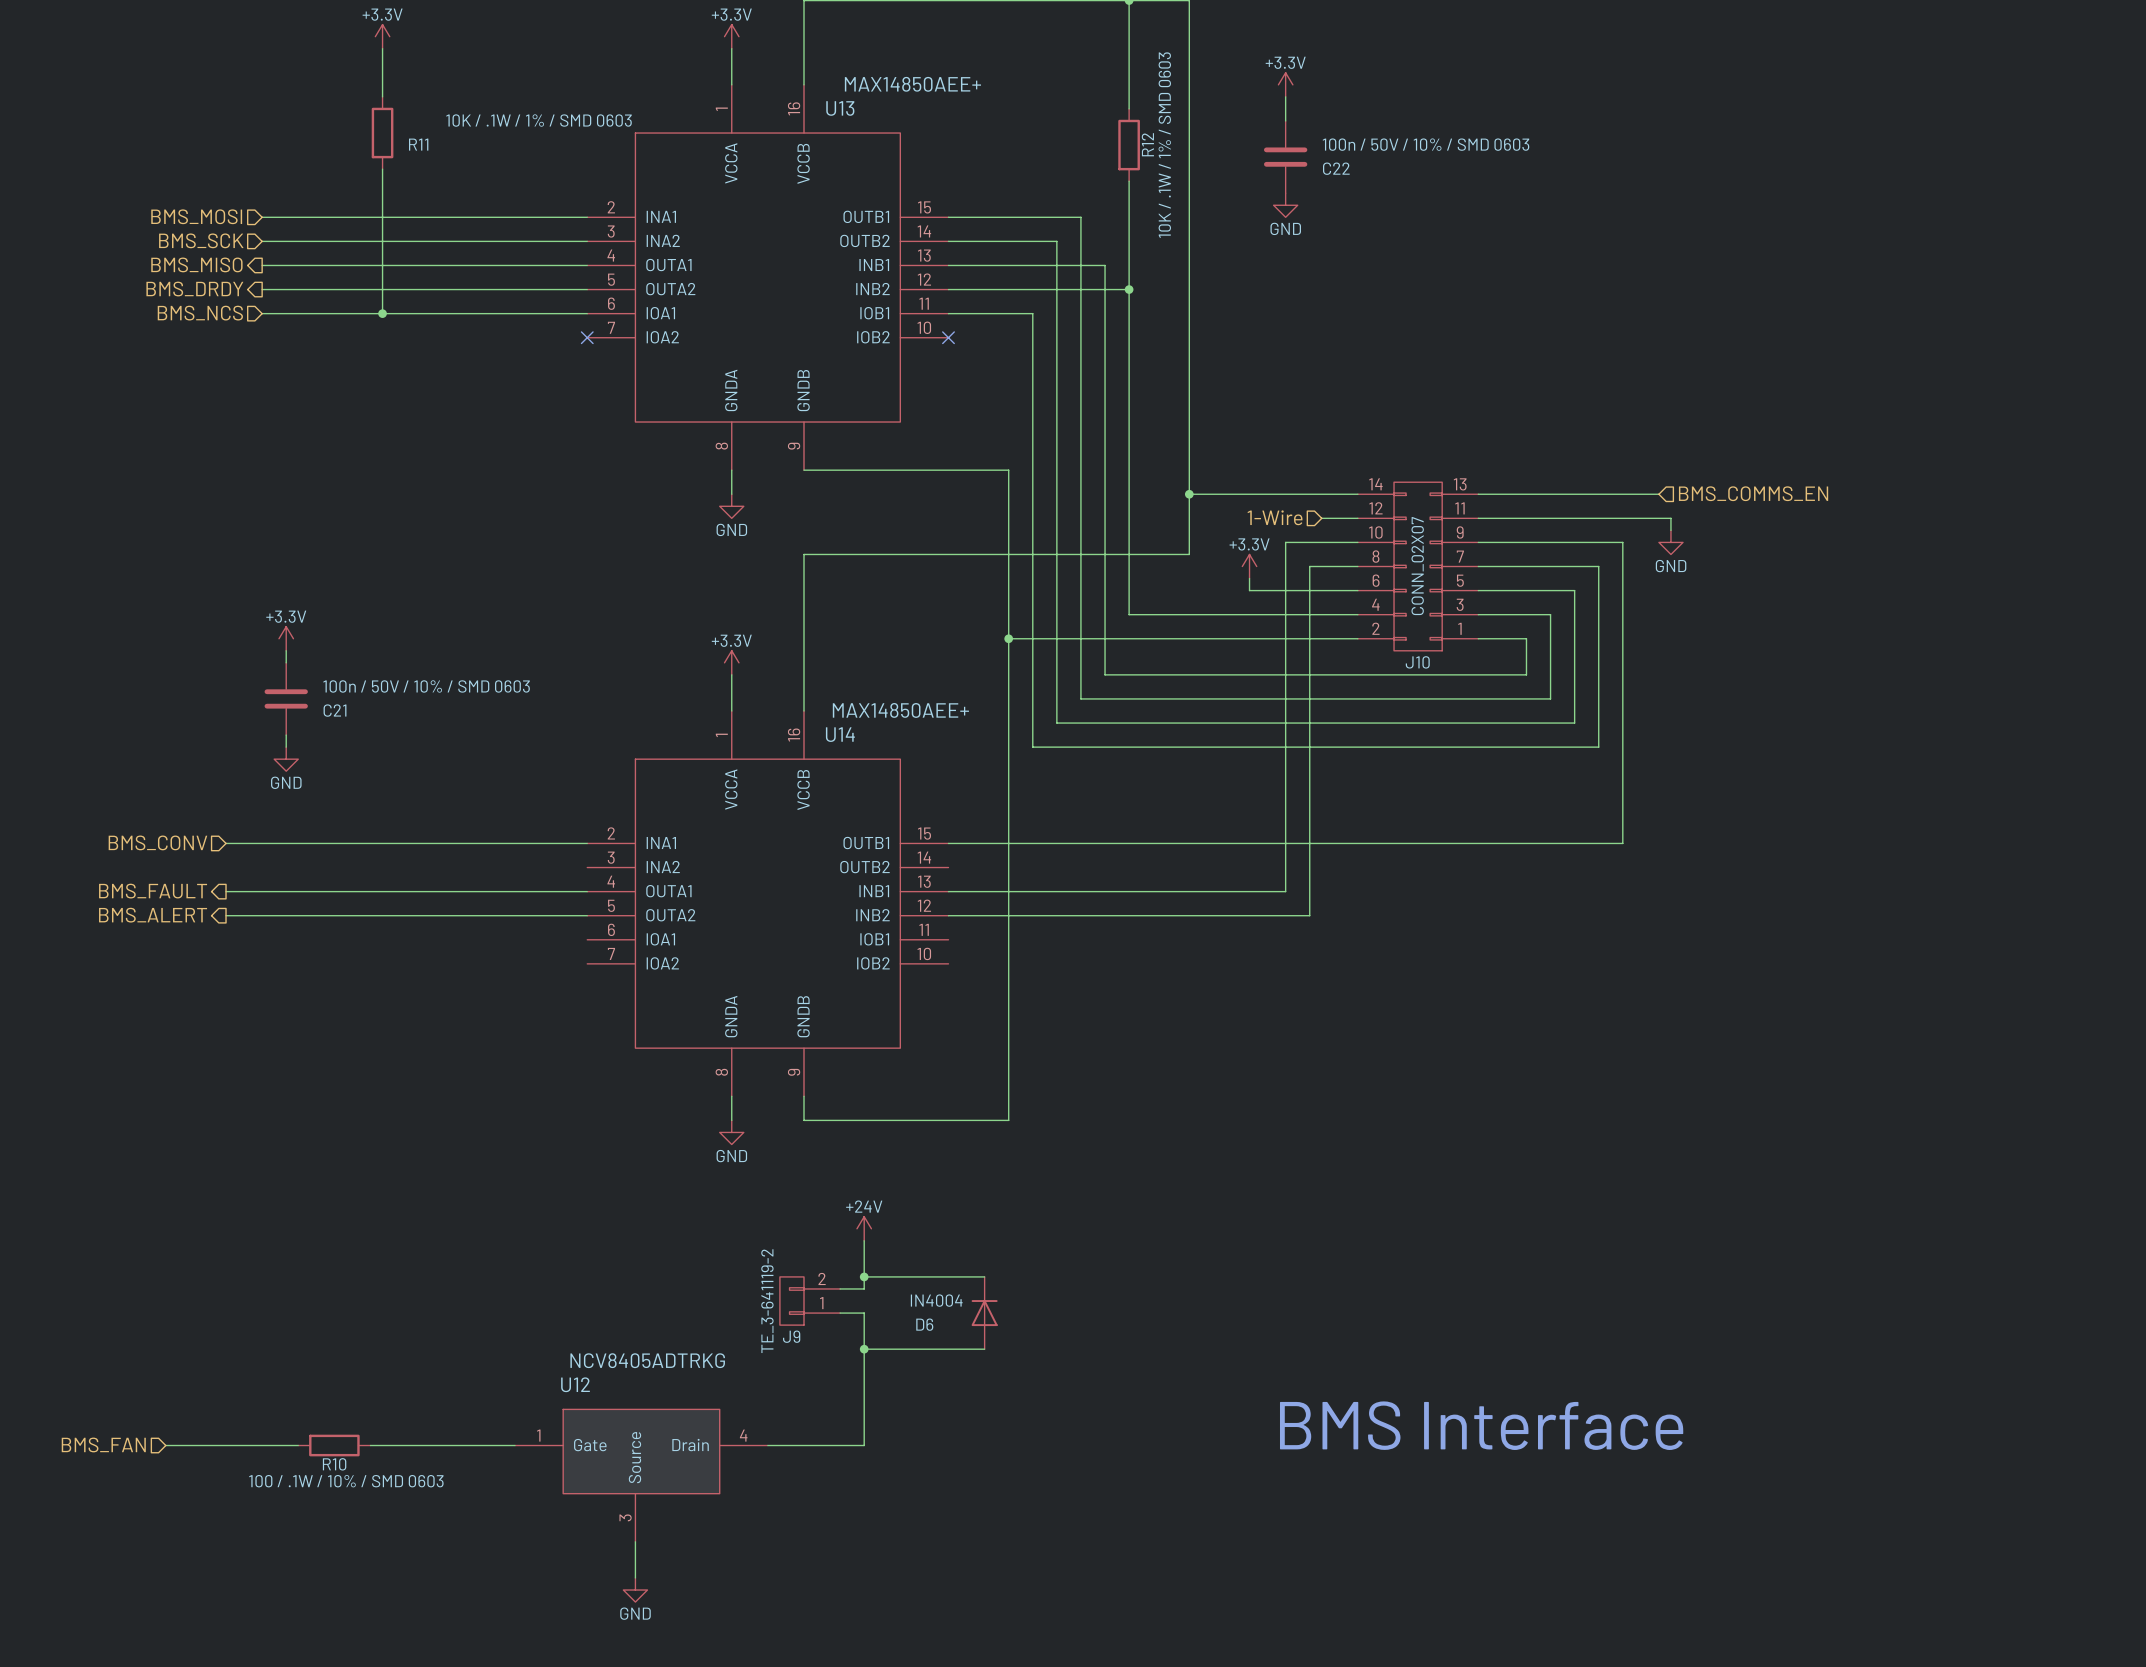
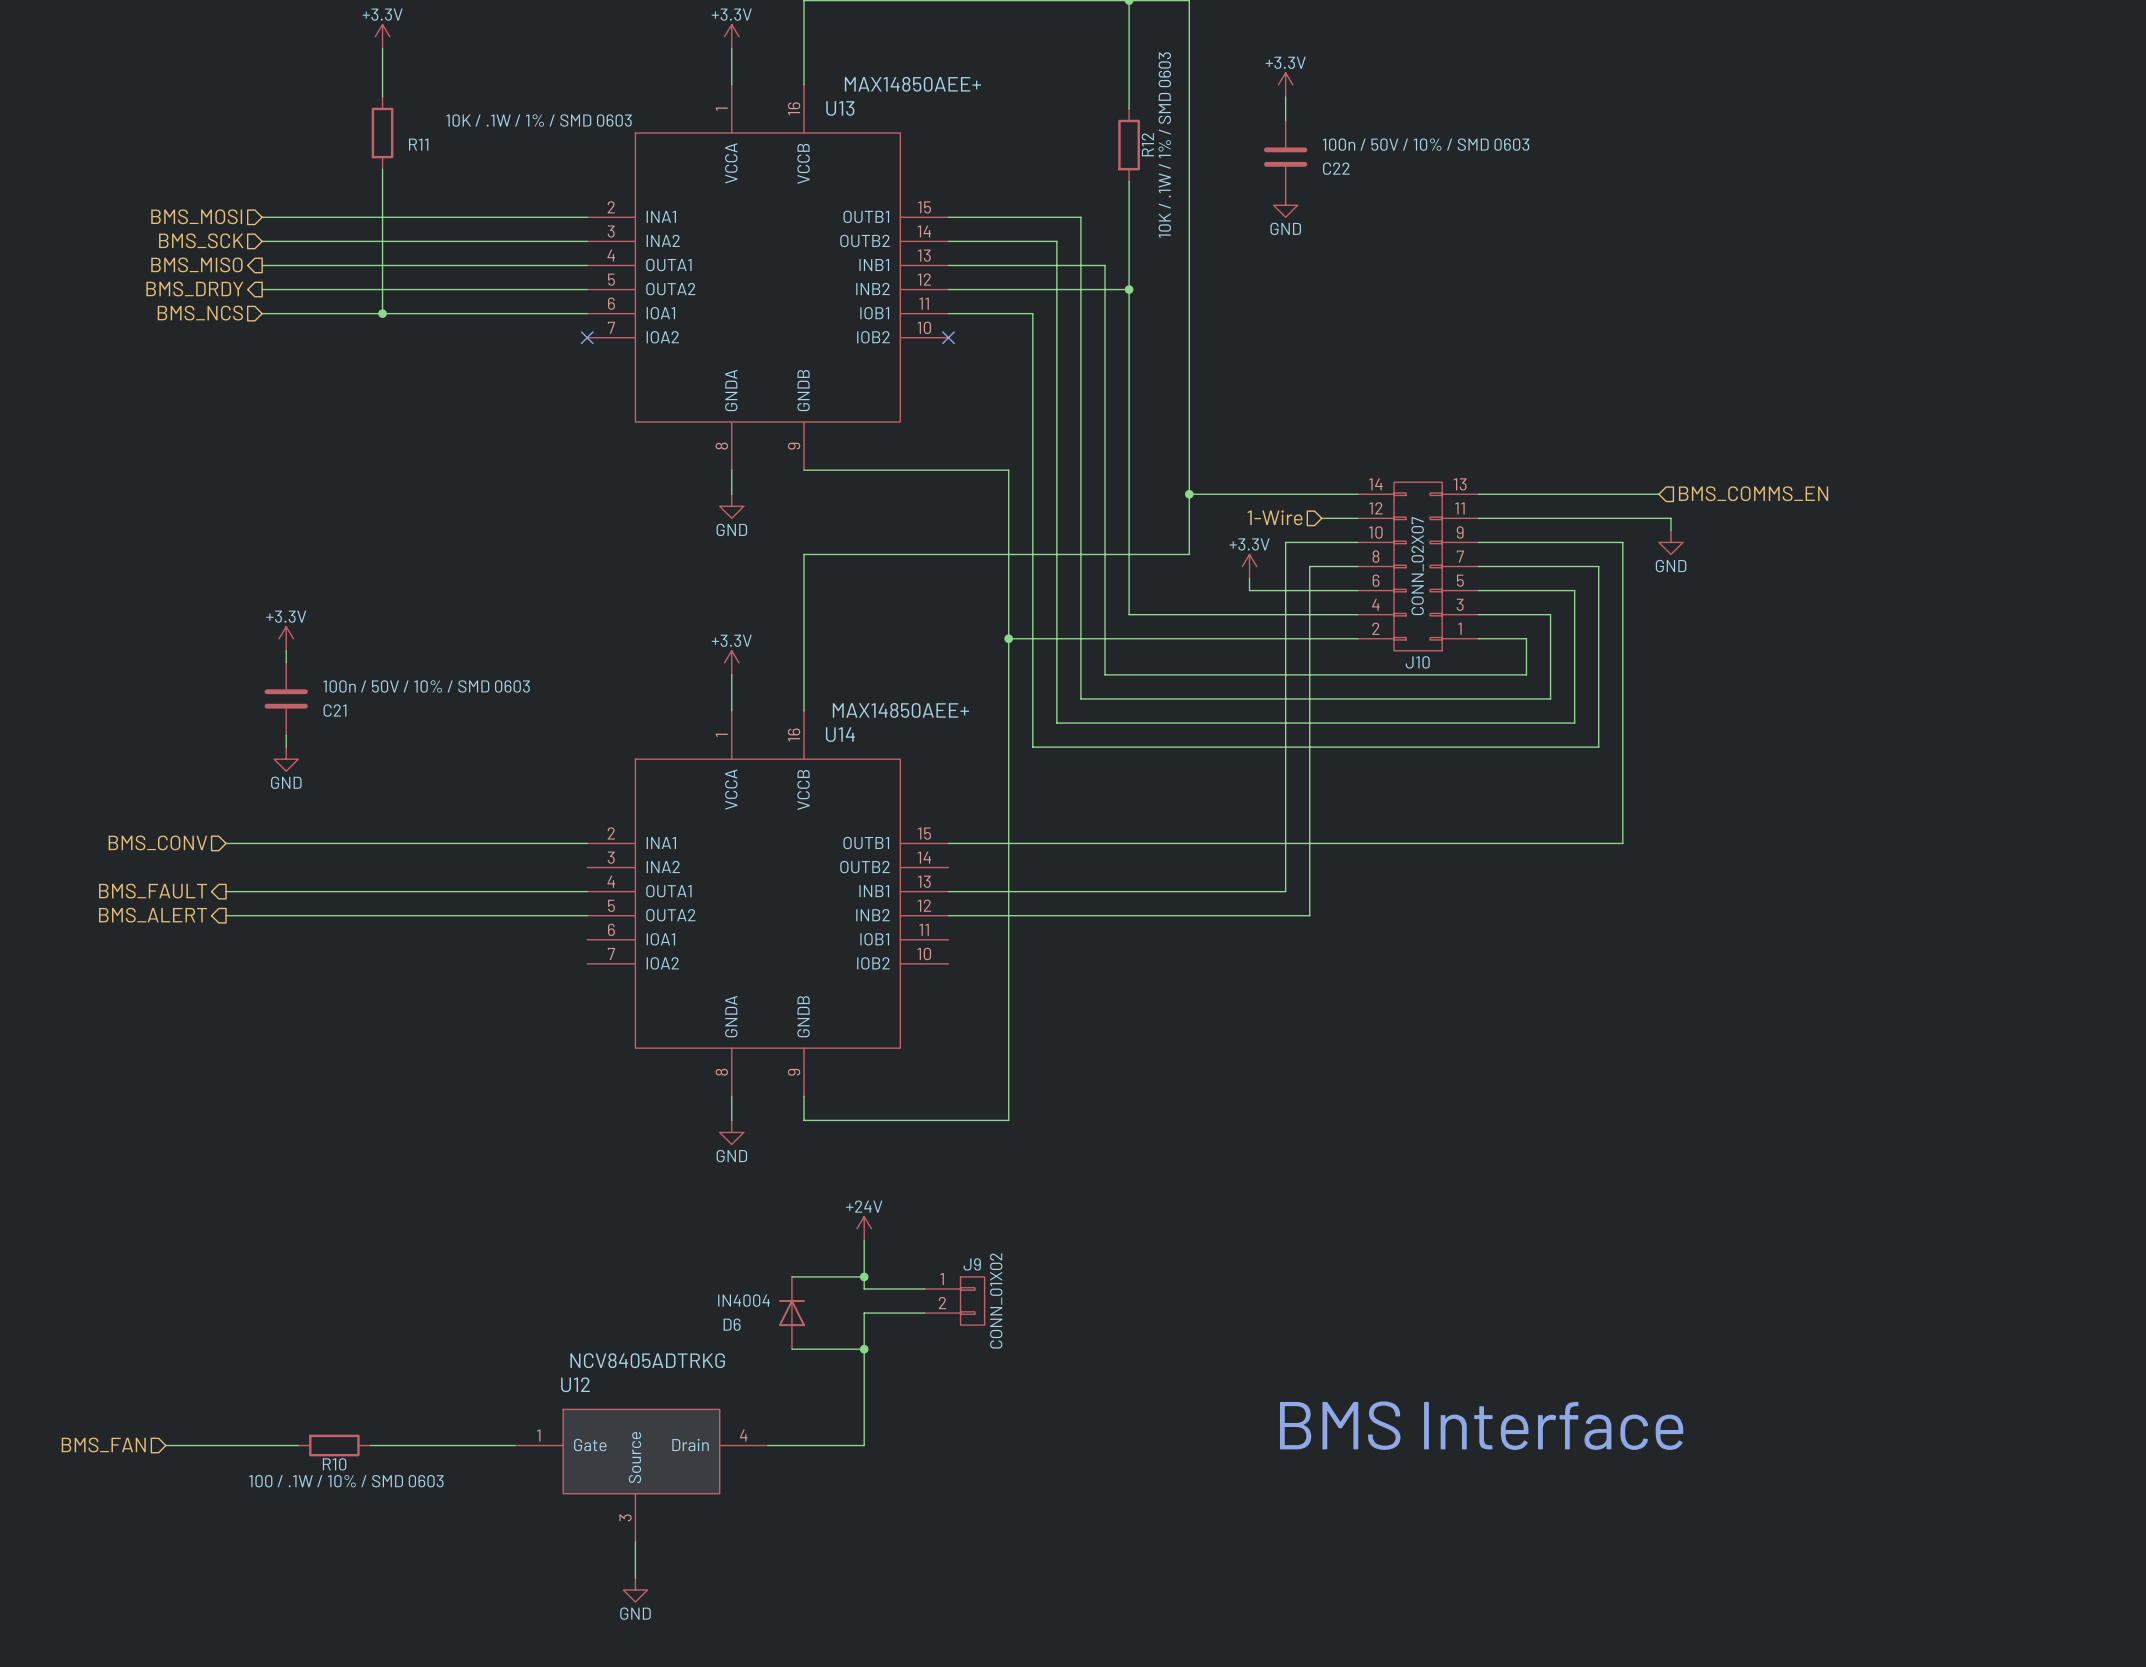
wire: (864, 1276) (984, 1276) -> (864, 1276) (791, 1276)
wire: (840, 1288) (864, 1288) -> (924, 1288) (864, 1288)
J9 value: TE_3-641119-2 (767, 1301) -> CONN_01X02 (996, 1300)
J9 rotation: 0° (791, 1301) -> 180° (972, 1301)
J9 position: (810, 1301) -> (954, 1301)
wire: (840, 1313) (864, 1313) -> (924, 1313) (864, 1313)
D6 position: (984, 1313) -> (791, 1313)
wire: (864, 1349) (984, 1349) -> (864, 1349) (791, 1349)

